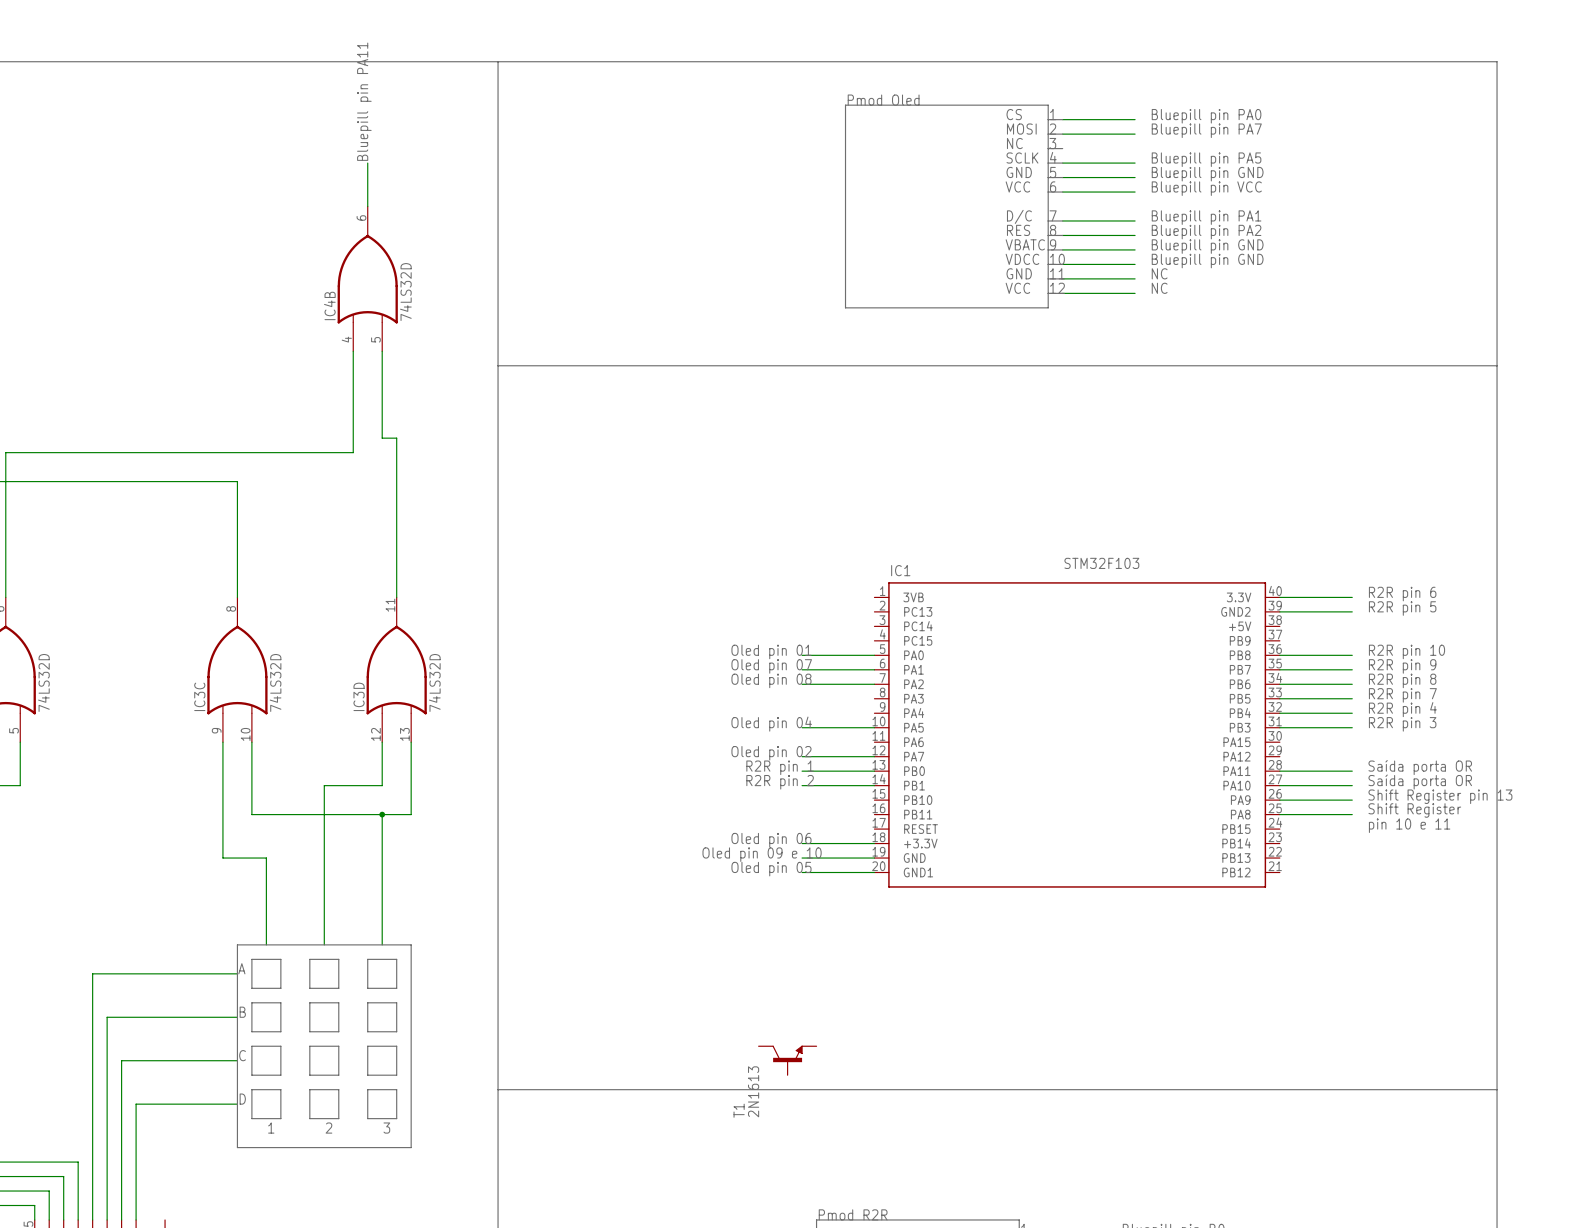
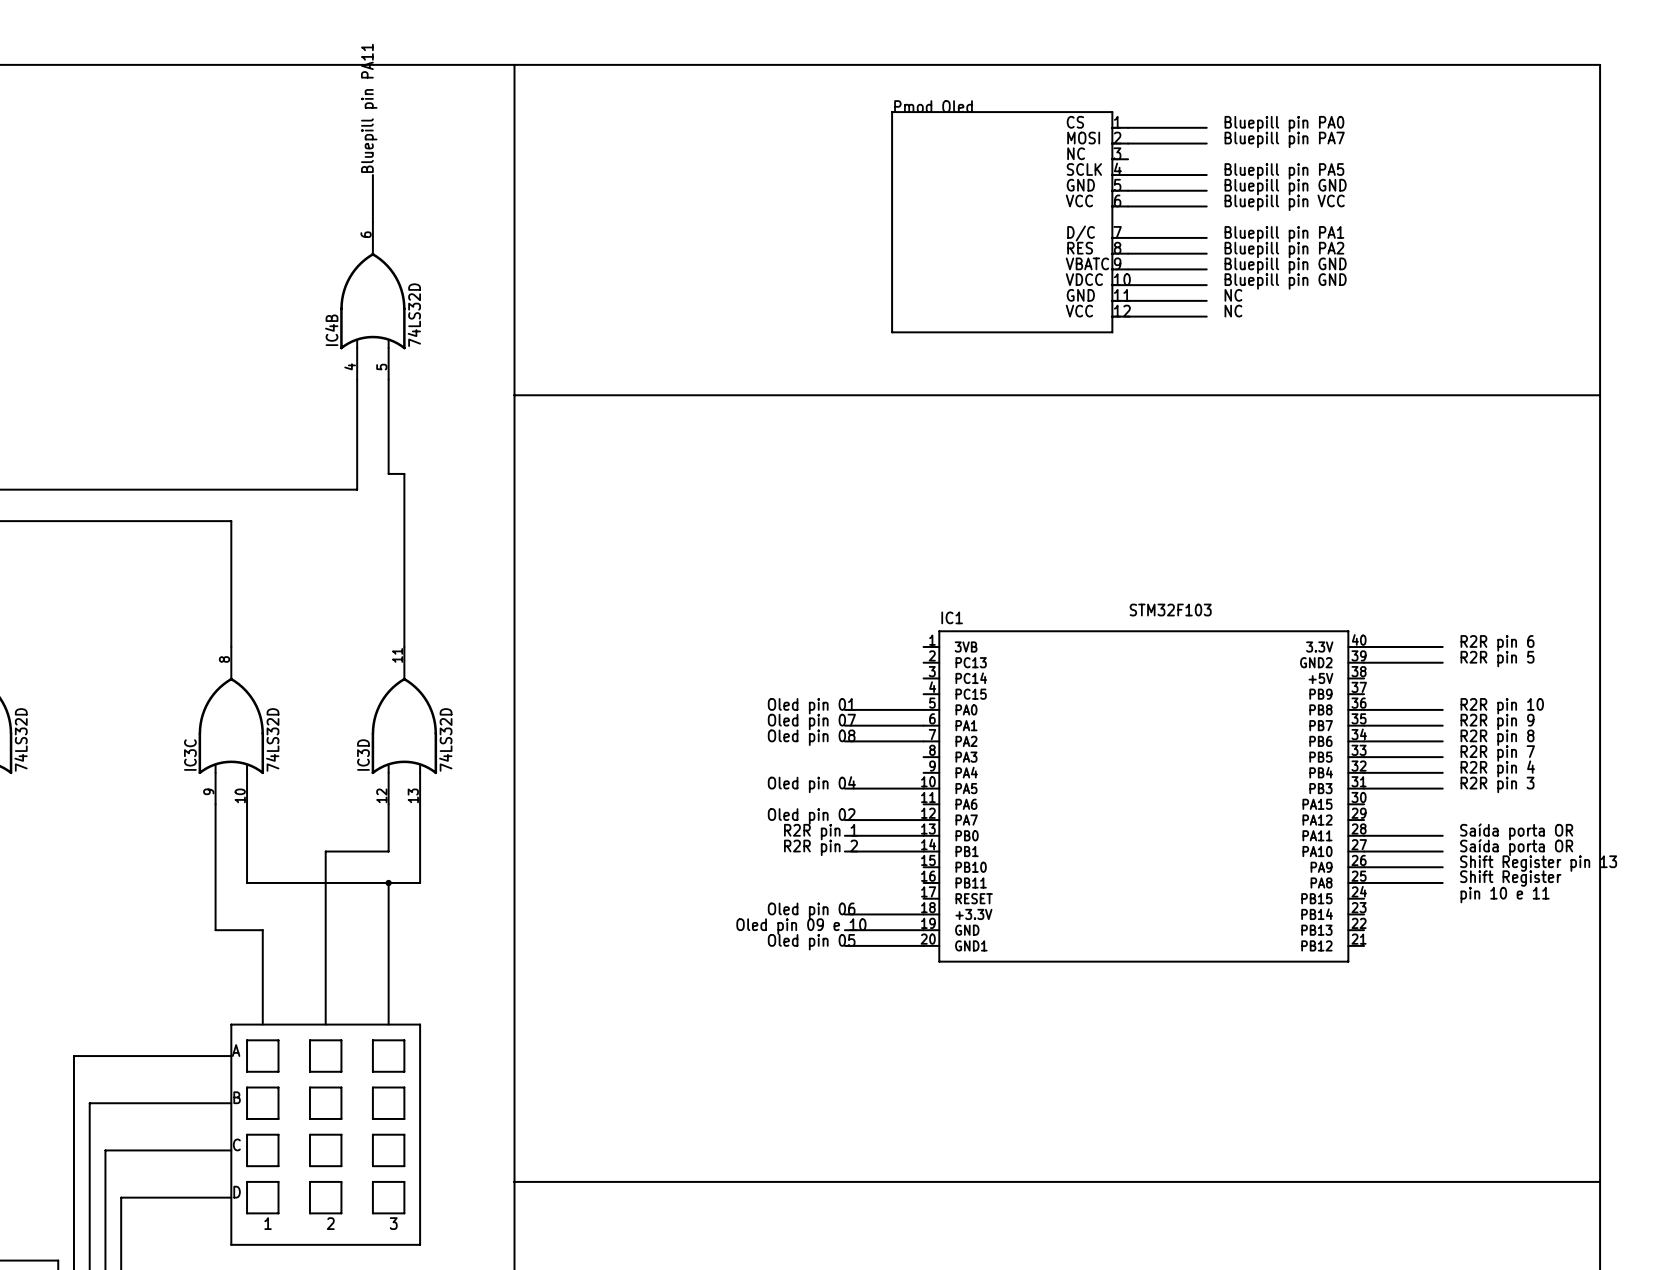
T1: 2N1613 (787, 1060) -> none

